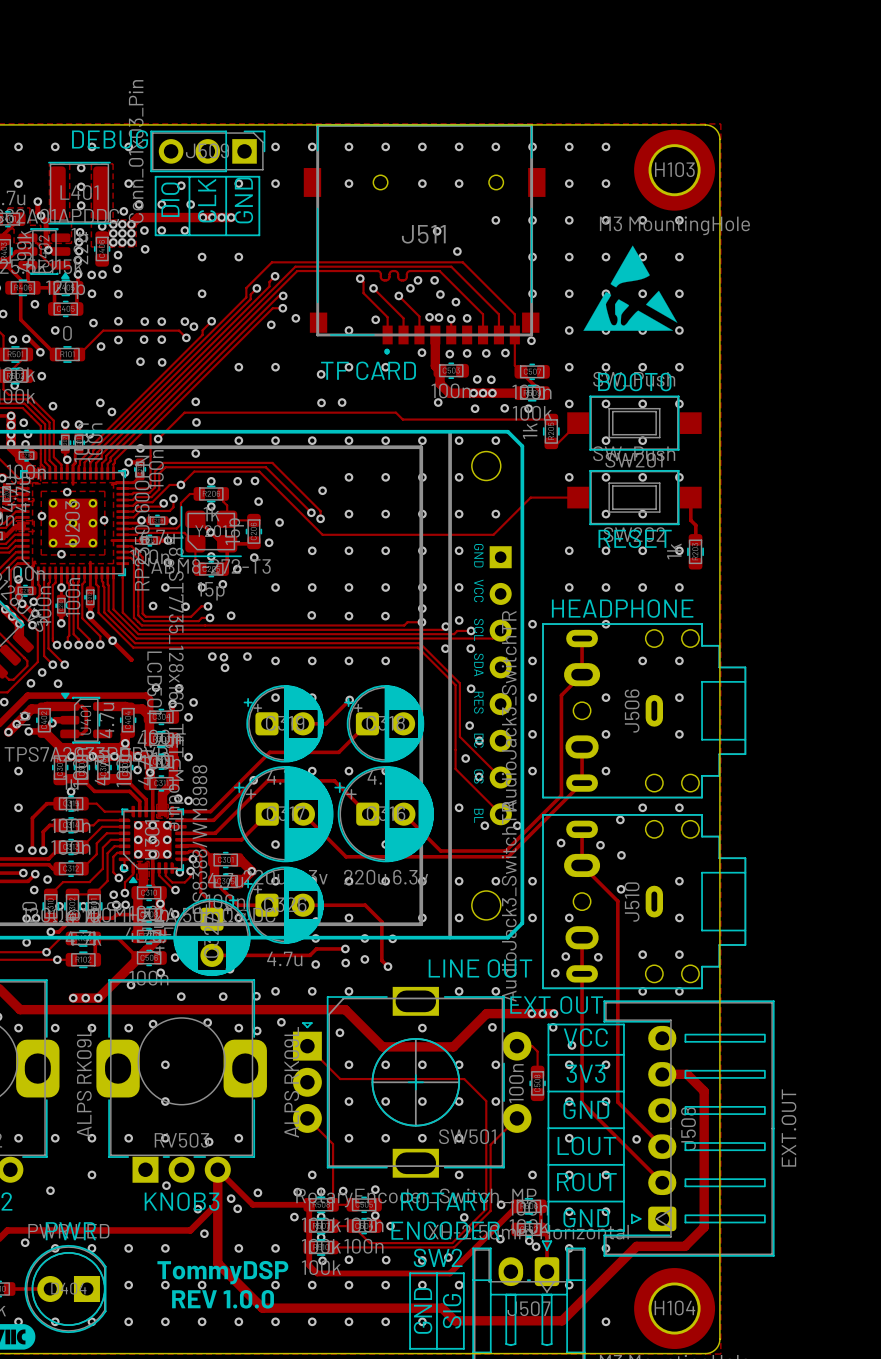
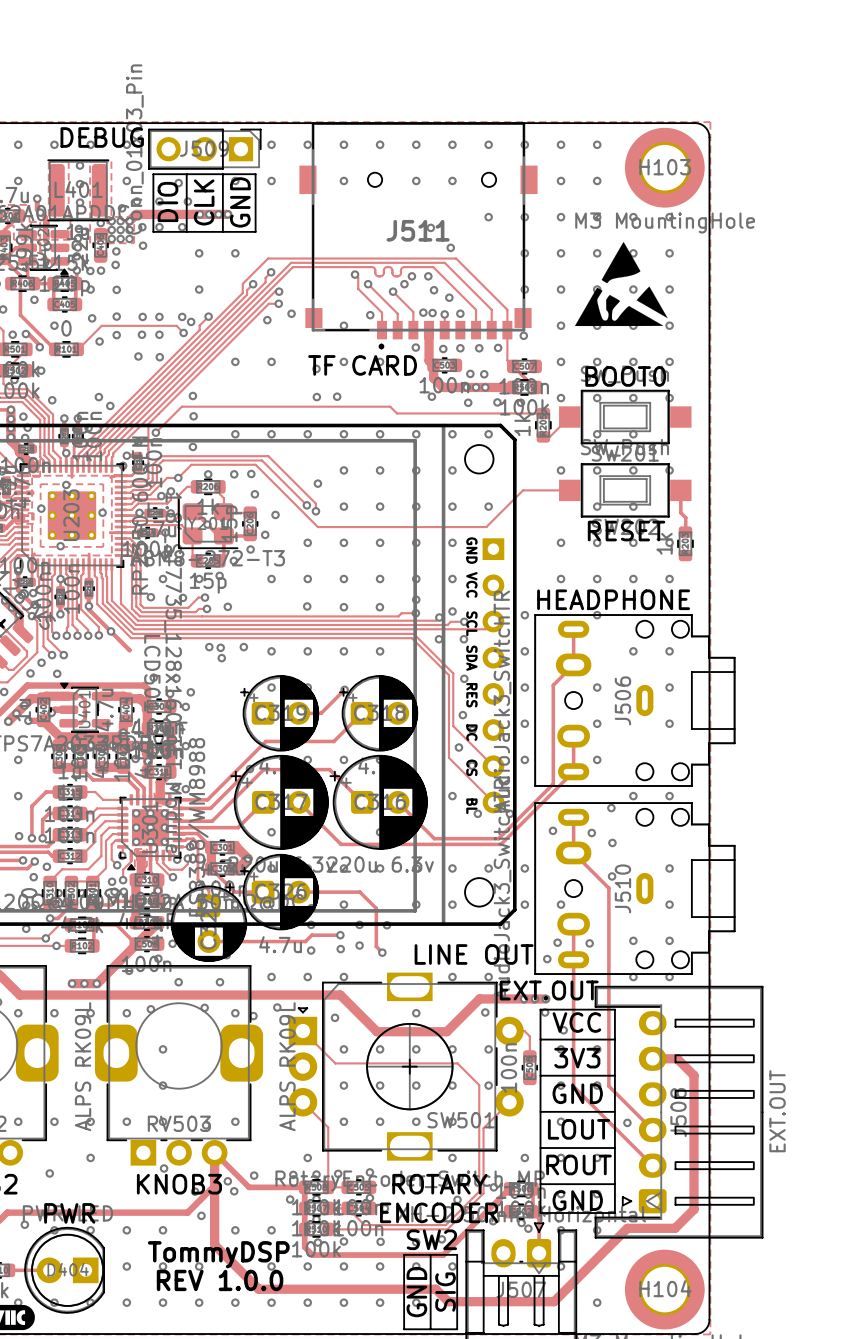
via: (211, 506) -> none
via: (211, 556) -> none
via: (71, 791) -> none
via: (256, 996) -> none

